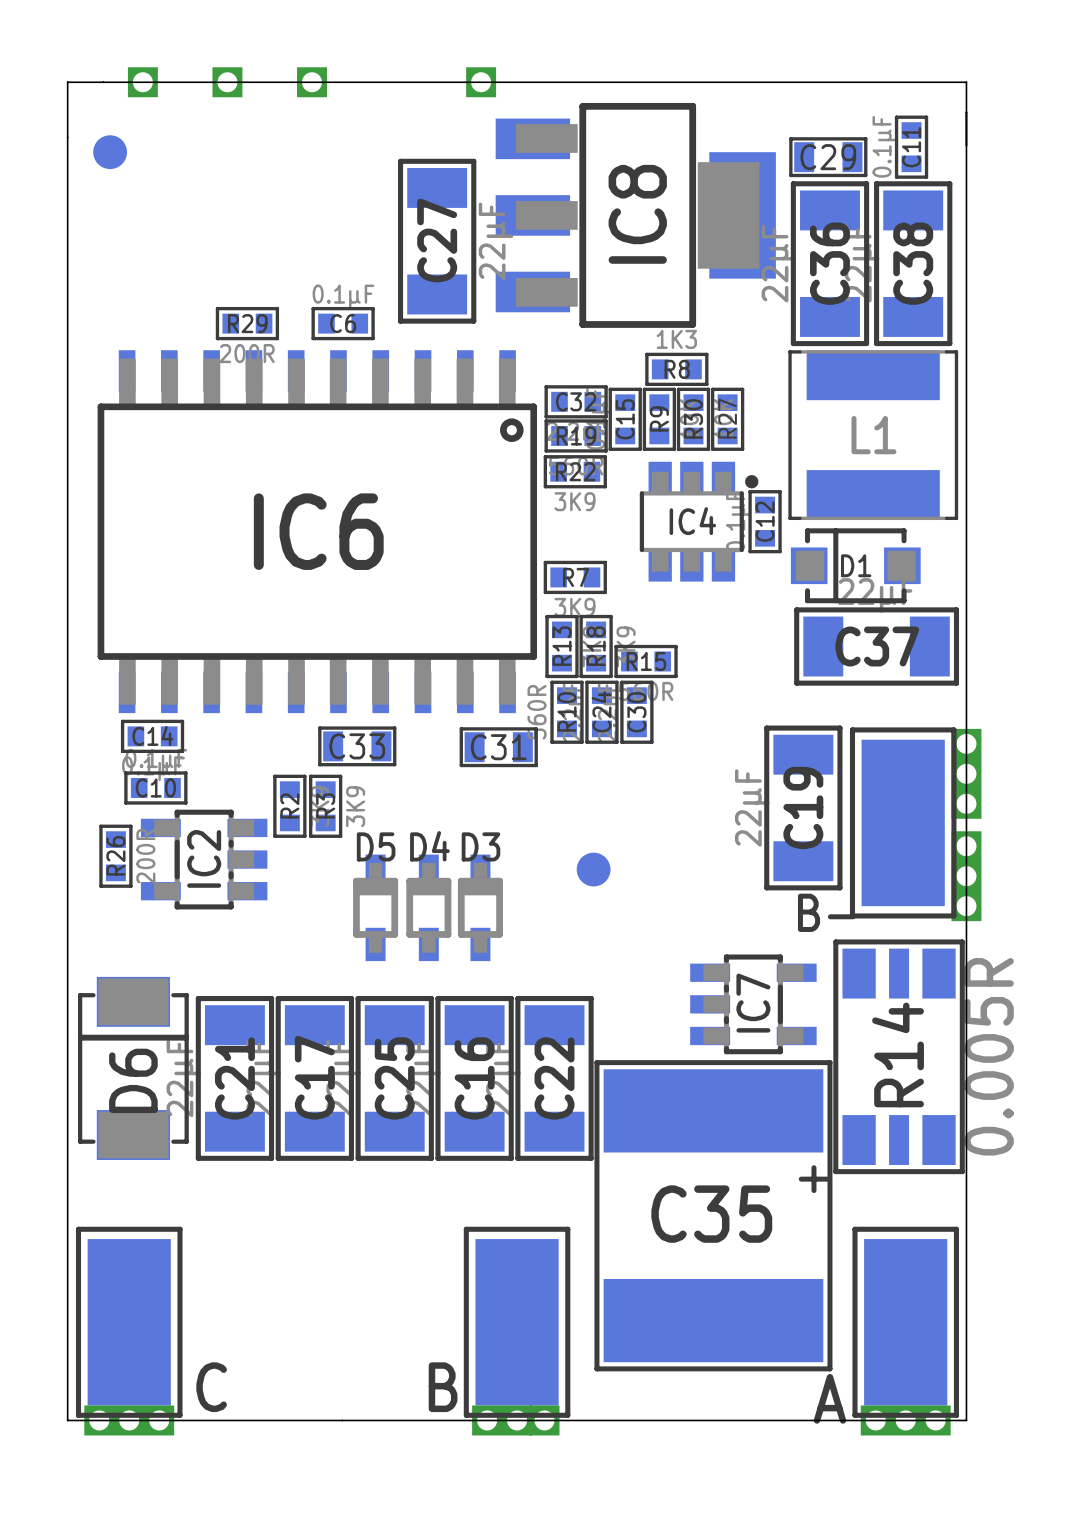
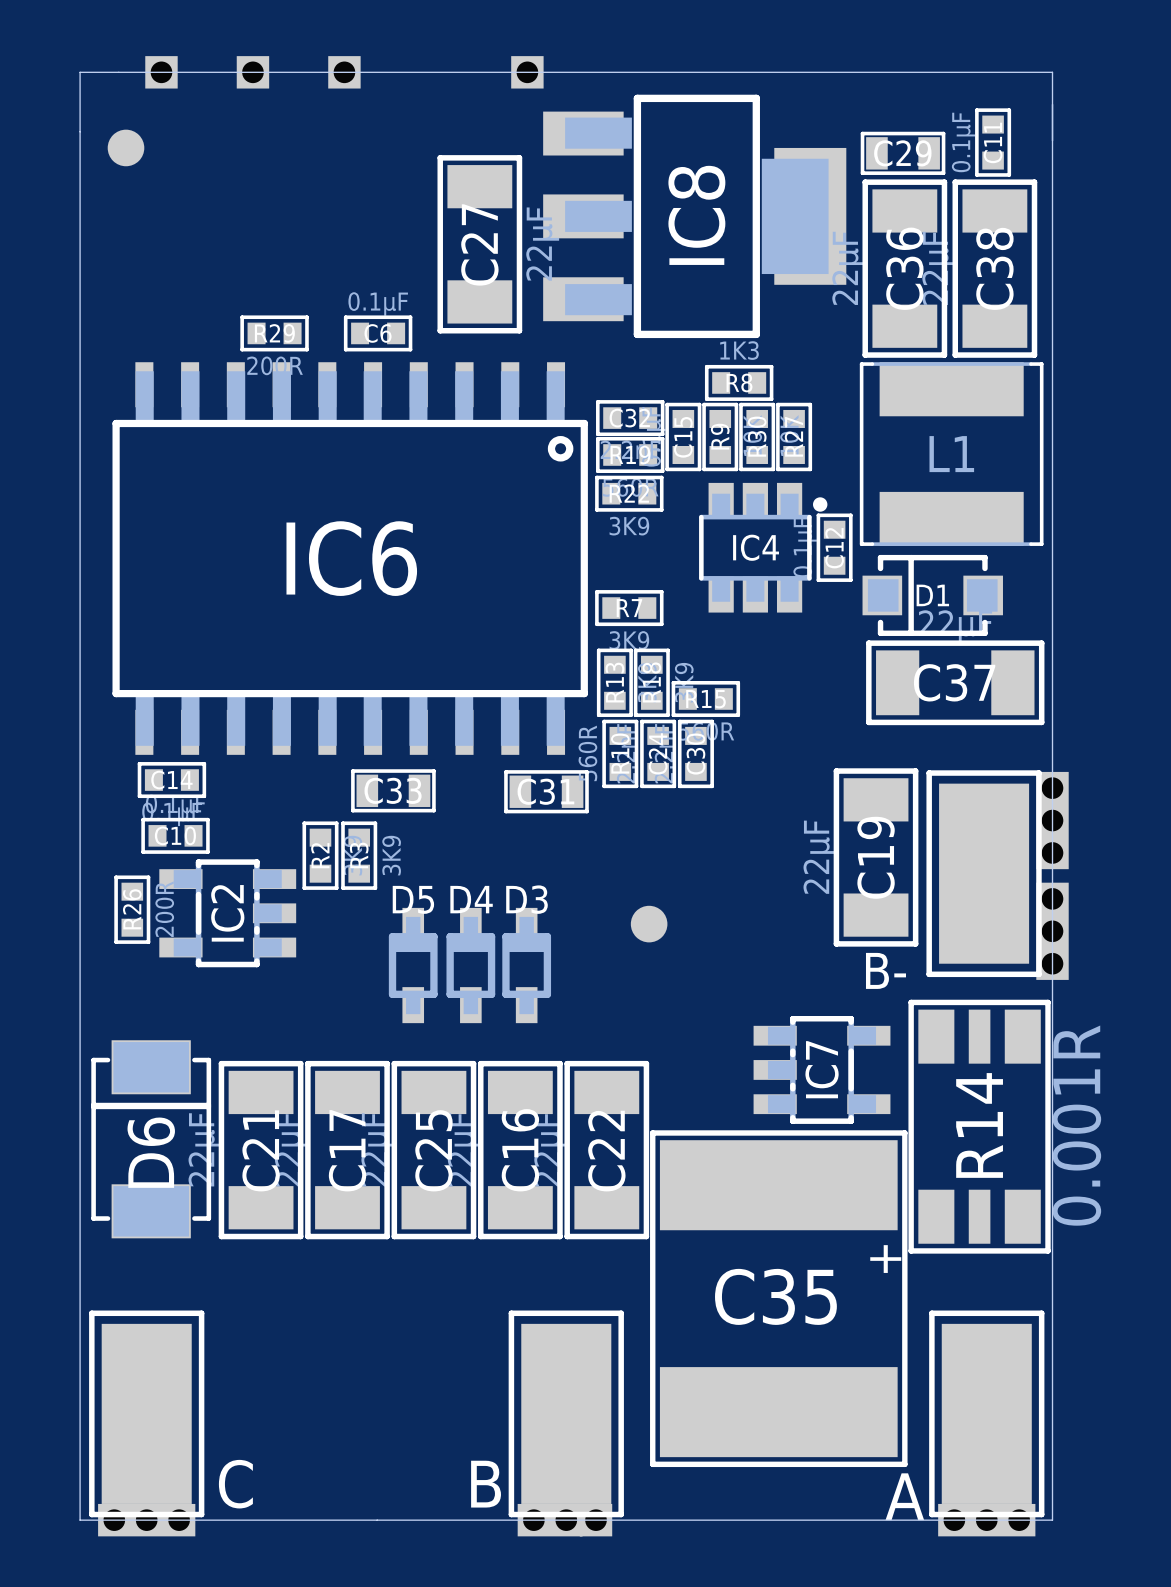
R14 value: 0.005R (988, 1056) -> 0.001R (1076, 1125)

